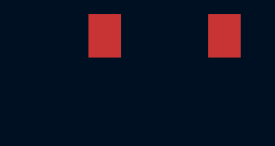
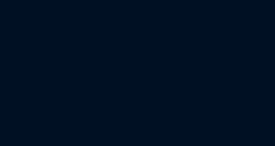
part: (164, 35) -> none

